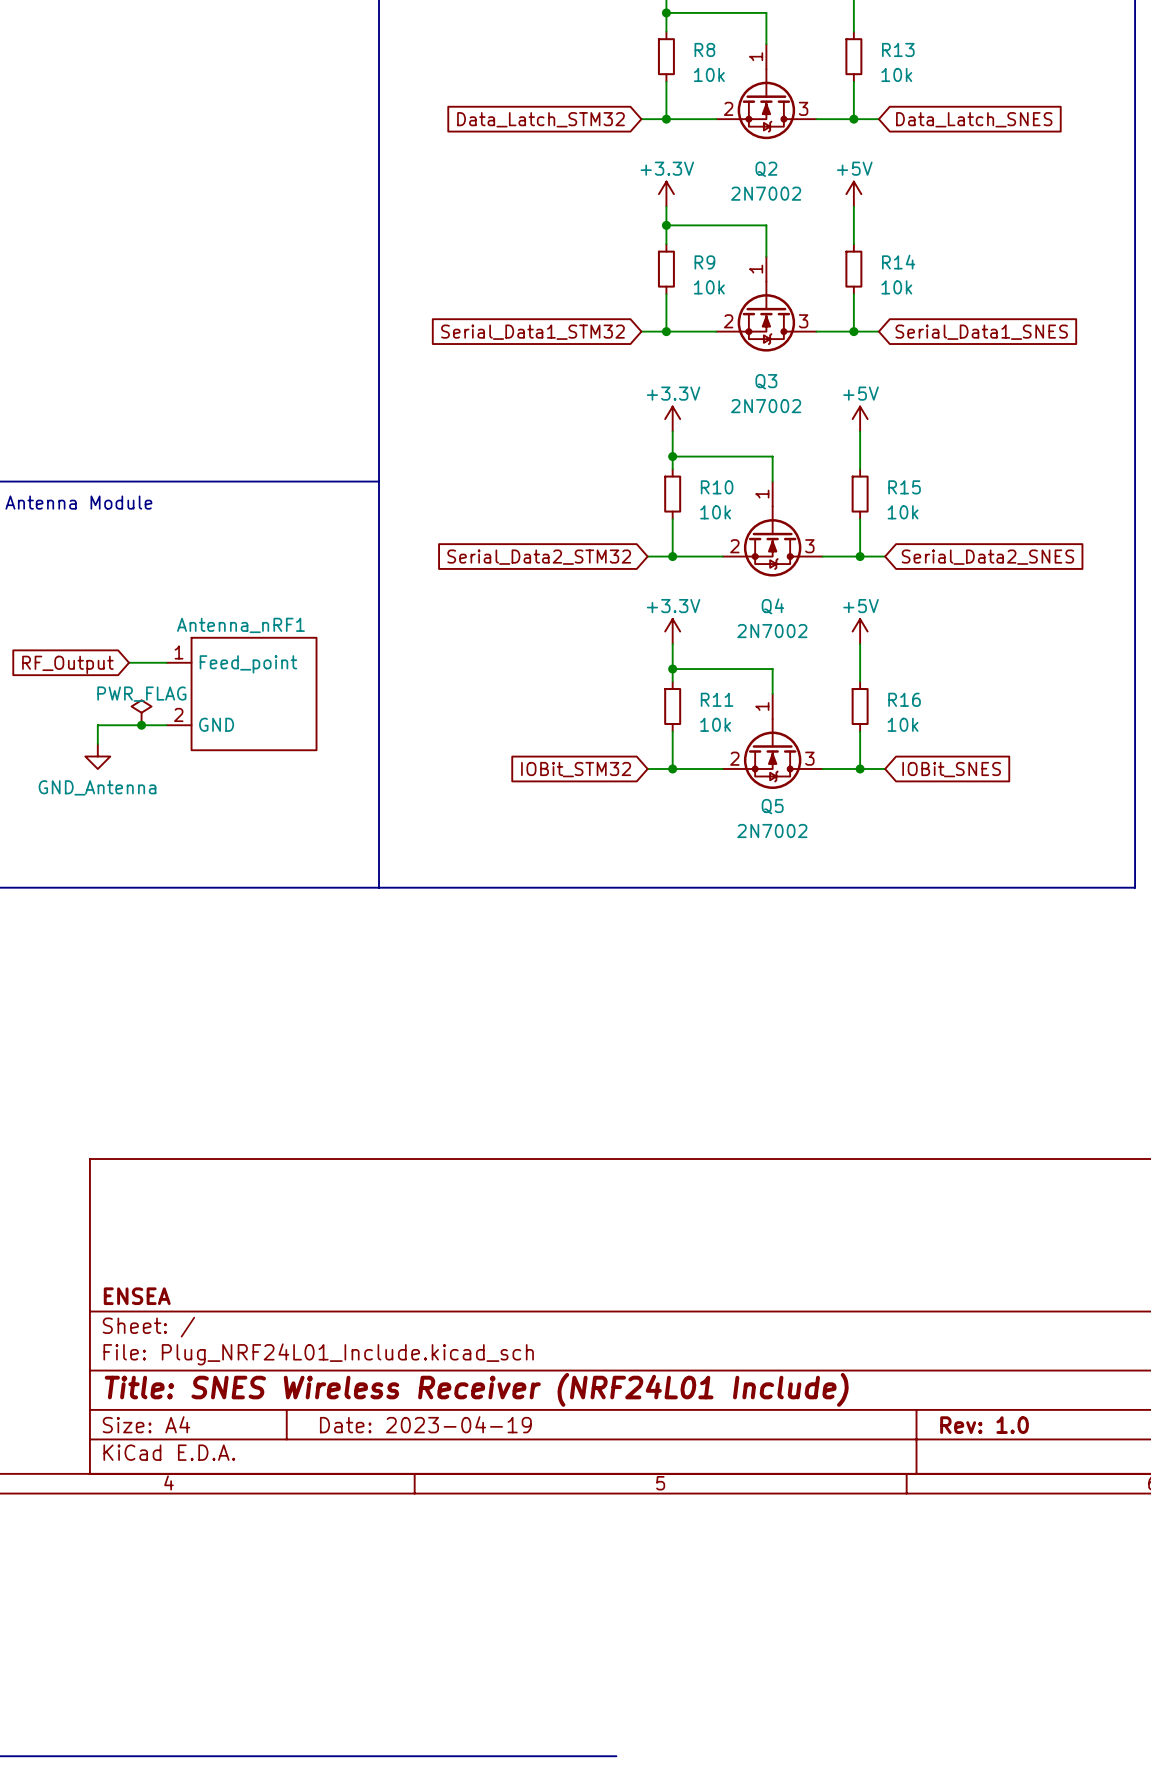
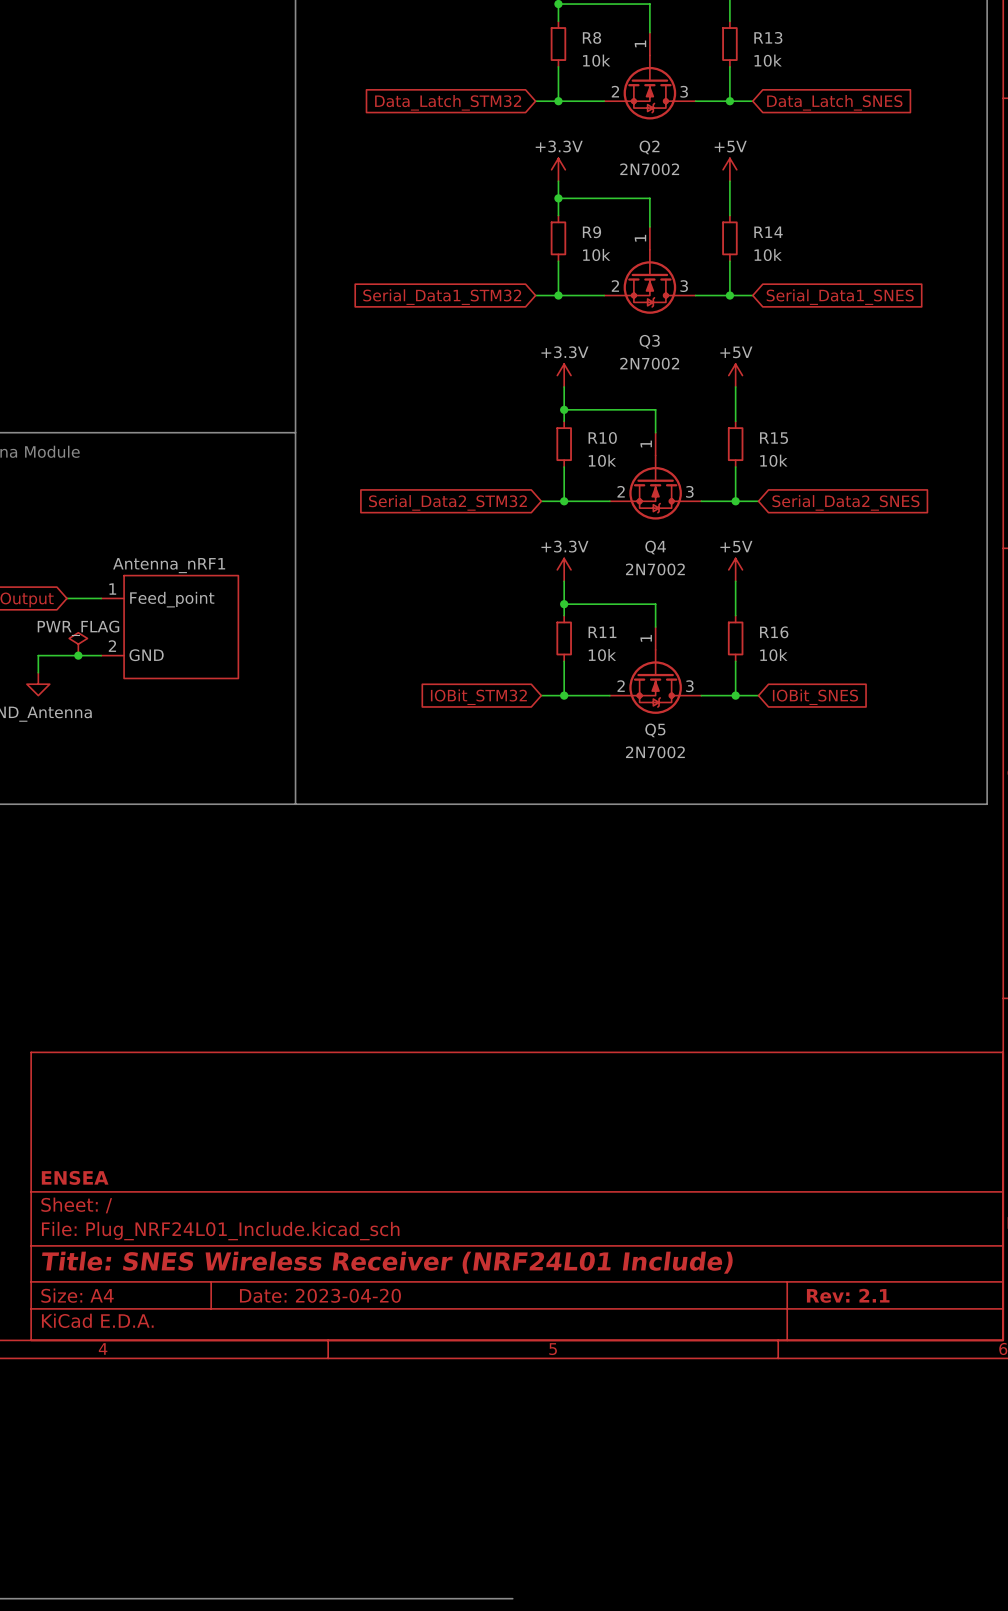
title block: Date: 2023-04-19 (425, 1424) -> Date: 2023-04-20 (320, 1295)
title block: Rev: 1.0 (984, 1425) -> Rev: 2.1 (848, 1295)

